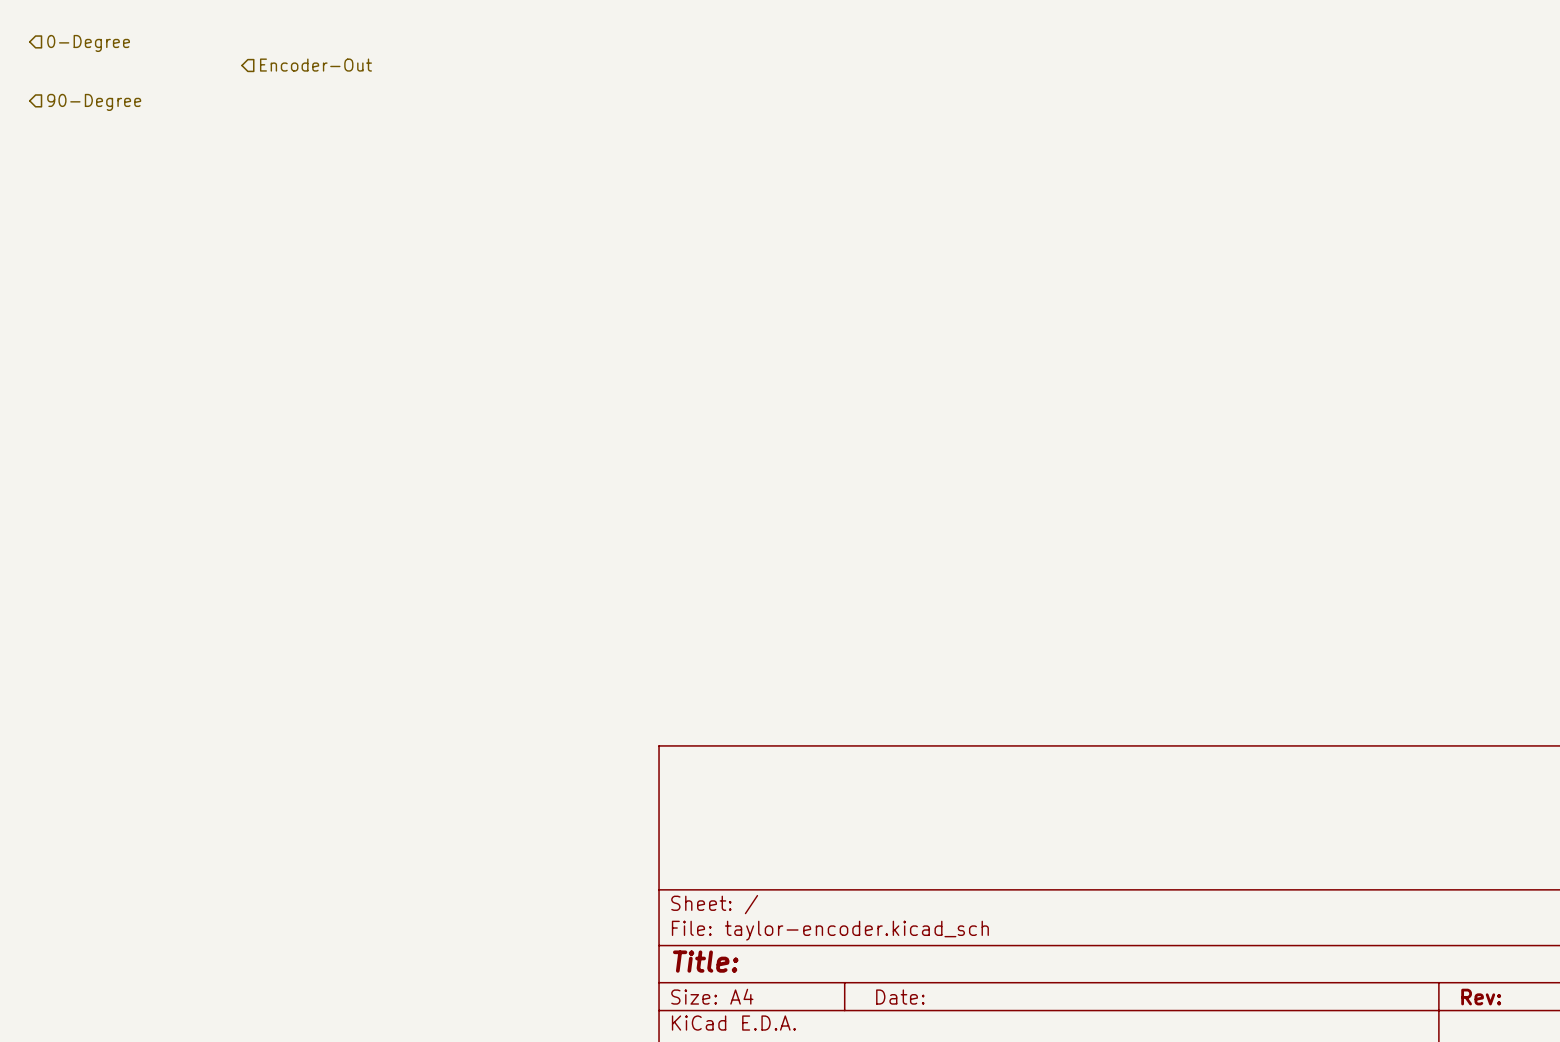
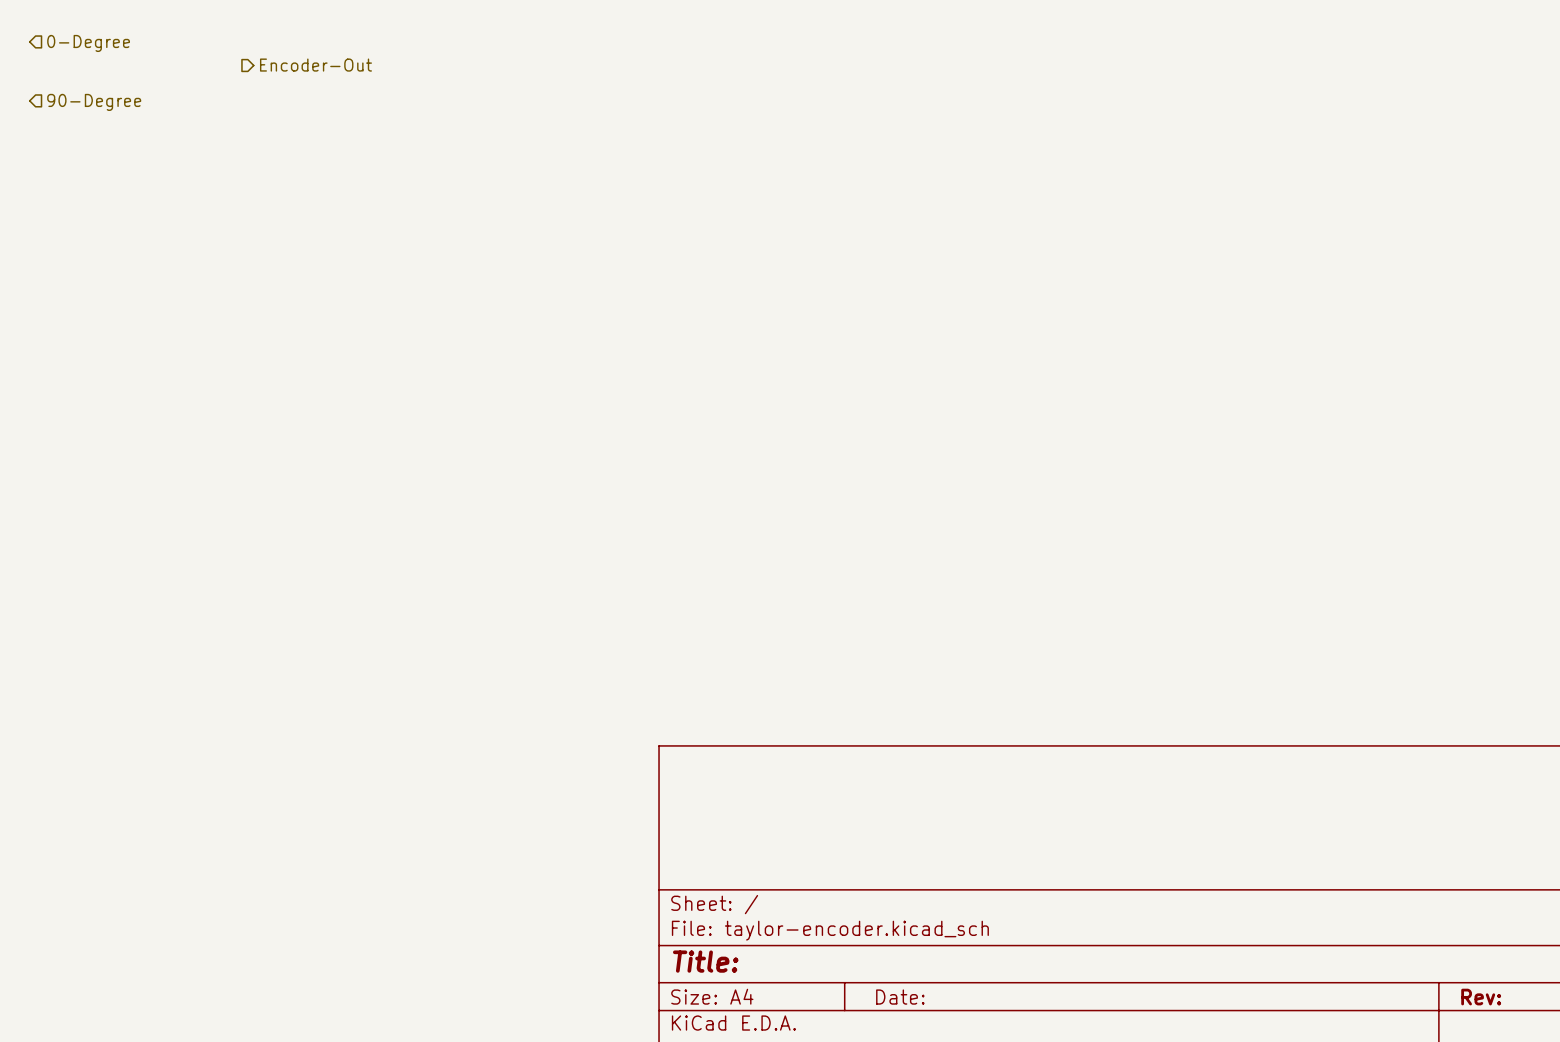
hierarchical label shape: input (315, 65) -> output (315, 65)

